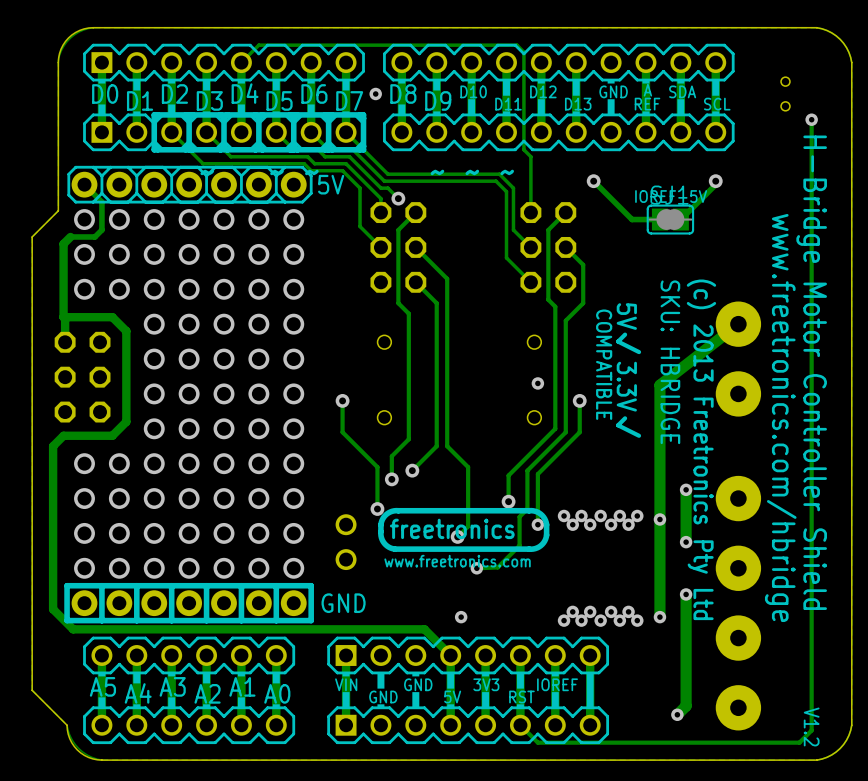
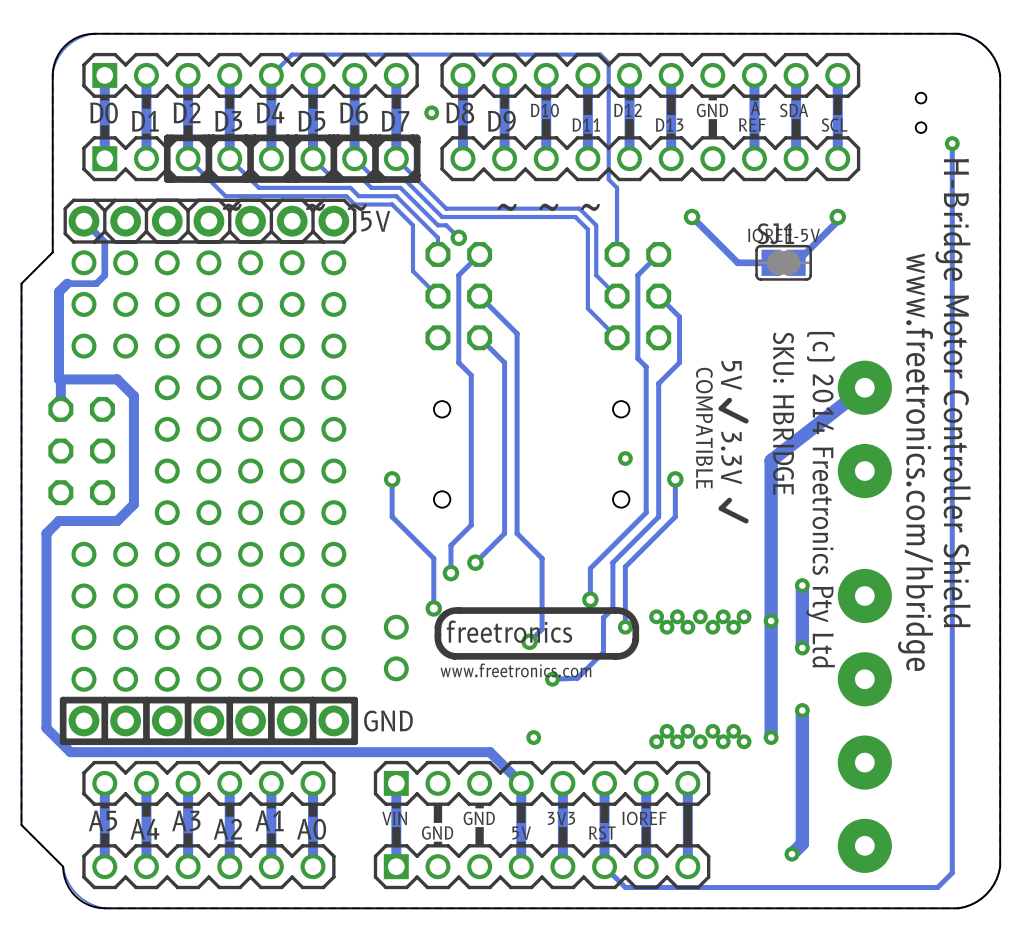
text: (c) 2013 Freetronics Pty Ltd (701, 449) -> (c) 2014 Freetronics Pty Ltd (820, 499)
text: V1.2 (811, 726) -> none

